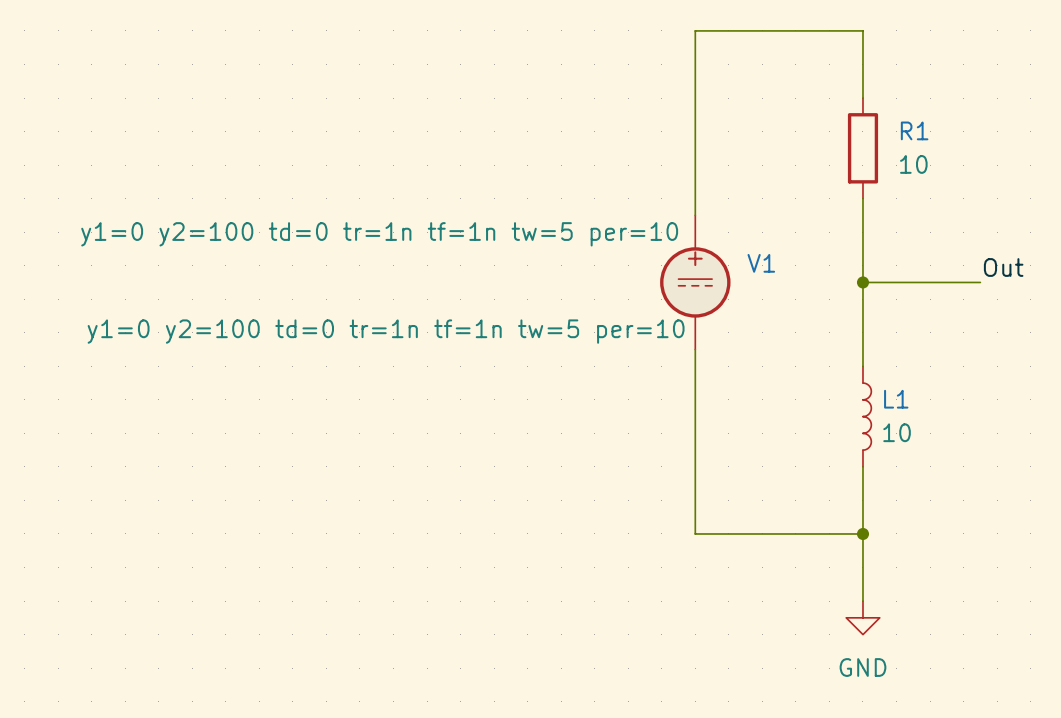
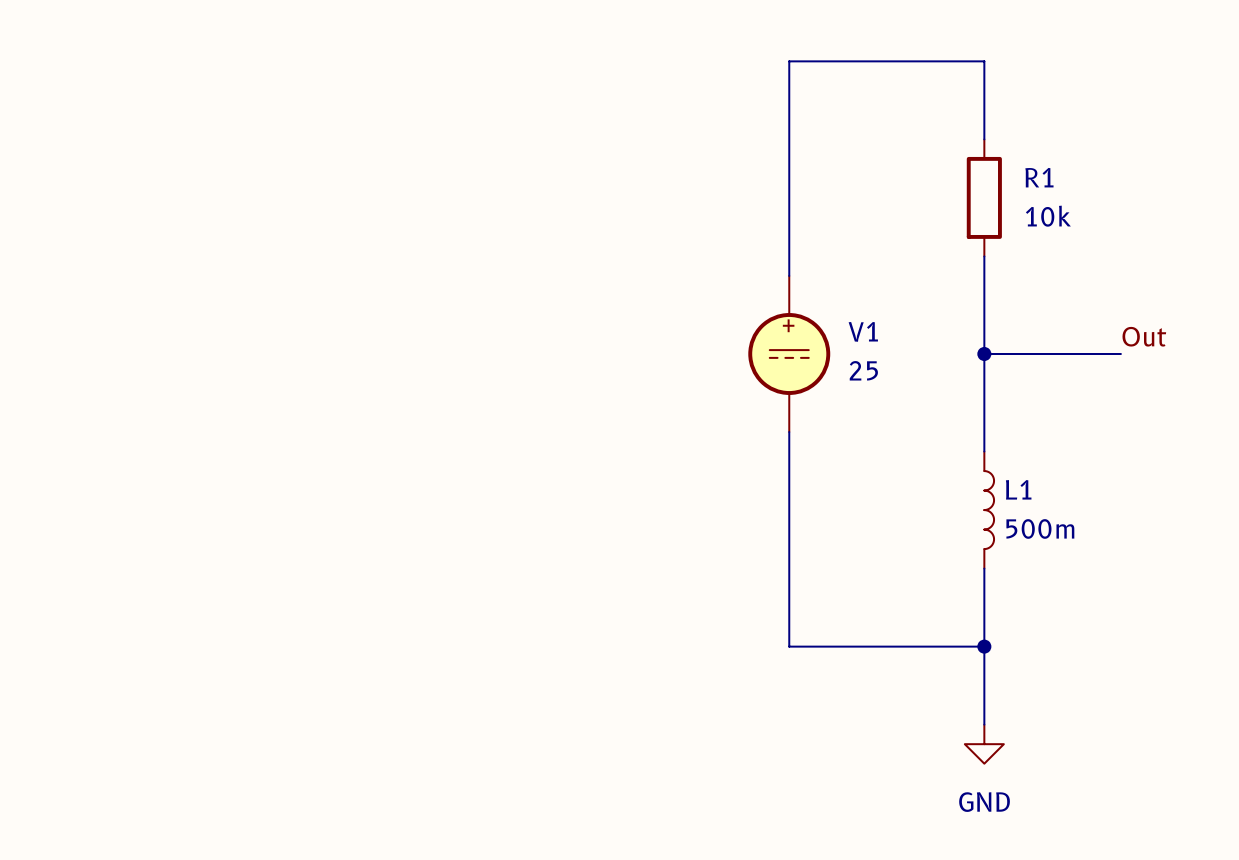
R1 value: 10 (913, 164) -> 10k (1048, 216)
V1 text: y1=0 y2=100 td=0 tr=1n tf=1n tw=5 per=10 (379, 234) -> none
V1 value: y1=0 y2=100 td=0 tr=1n tf=1n tw=5 per=10 (386, 331) -> 25 (863, 370)
L1 value: 10 (897, 432) -> 500m (1040, 528)

